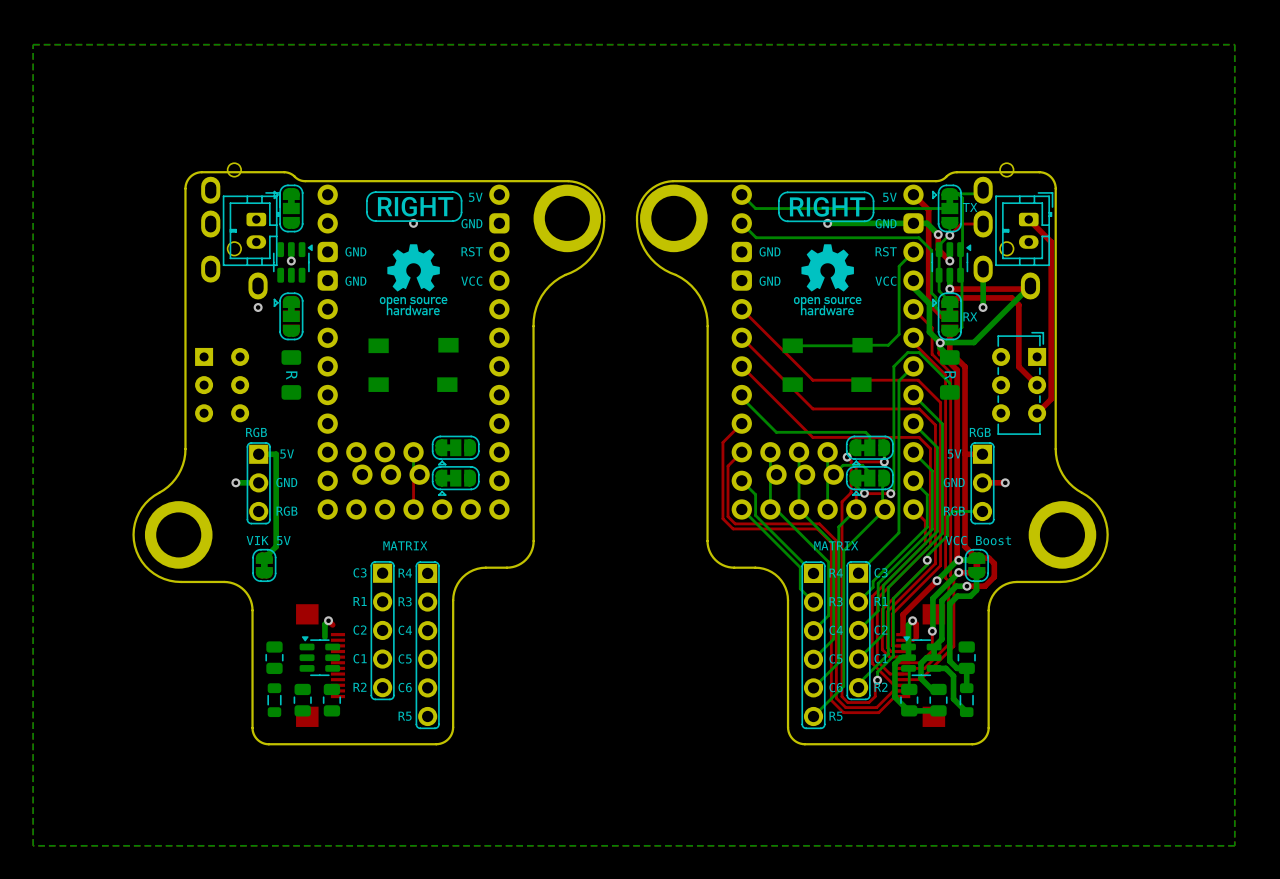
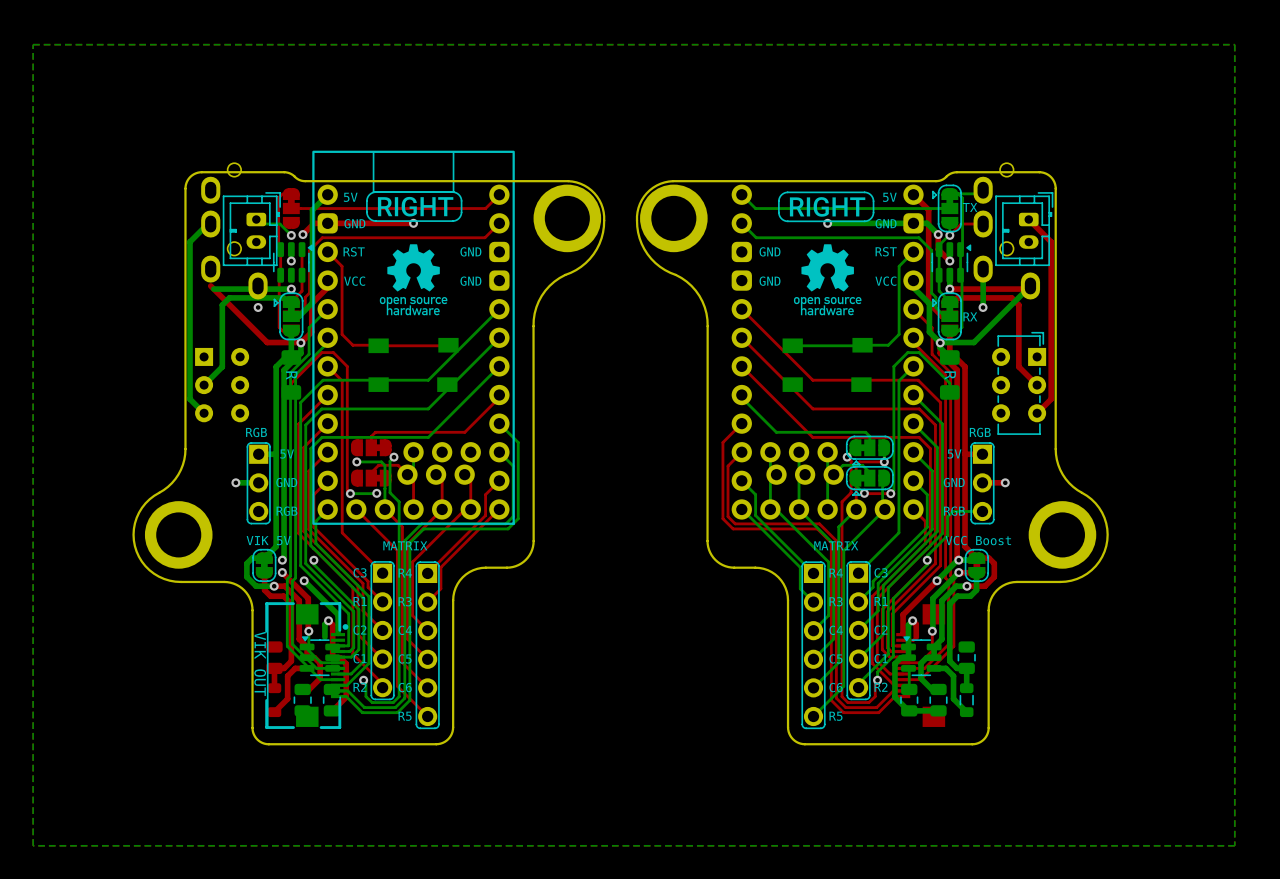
top track: none -> (282, 193) (278, 198) (280, 275)
bottom track: none -> (327, 194) (312, 209) (312, 302) (299, 316) (291, 316)
top track: none -> (499, 194) (485, 208) (300, 208)
part side: bottom (288, 208) -> top (291, 208)
bottom track: none -> (212, 219) (189, 241) (189, 399) (204, 413)
top track: none -> (413, 223) (314, 223) (302, 234)
top track: none -> (499, 223) (484, 237) (322, 237) (309, 250) (309, 293) (305, 297) (305, 307) (296, 316)
bottom track: none -> (258, 224) (279, 224) (291, 235)
via: none -> (302, 234)
via: none -> (291, 235)
top track: none -> (302, 249) (302, 291) (291, 301)
top track: none -> (327, 251) (342, 266) (342, 334) (352, 345) (378, 345)
top track: none -> (279, 276) (279, 327) (282, 331) (291, 331)
top track: none -> (210, 285) (267, 342) (300, 342) (311, 332) (311, 303) (327, 287)
bottom track: none -> (291, 289) (213, 289)
via: none -> (291, 289)
bottom track: none -> (287, 301) (283, 297) (229, 297) (222, 305) (222, 366) (204, 385)
bottom track: none -> (327, 309) (309, 327) (309, 354) (290, 372) (290, 575) (287, 579) (287, 598)
bottom track: none -> (499, 309) (428, 380) (323, 380) (300, 402) (300, 565) (348, 613) (348, 645) (337, 645)
bottom track: none -> (291, 330) (291, 351) (276, 366) (276, 454)
bottom track: none -> (499, 337) (428, 408) (321, 408) (305, 425) (305, 563) (353, 611) (353, 647) (349, 651) (337, 651)
bottom track: none -> (300, 342) (300, 353) (284, 370) (284, 558) (282, 560)
via: none -> (300, 342)
bottom track: none -> (327, 342) (295, 374) (295, 578) (292, 581) (292, 600)
top track: none -> (448, 345) (379, 345)
part side: top (413, 352) -> bottom (413, 337)
top track: none -> (327, 366) (342, 380) (342, 532) (382, 573)
bottom track: none -> (499, 366) (428, 437) (321, 437) (310, 448) (310, 545) (313, 548)
top track: none -> (291, 392) (291, 383) (321, 352) (333, 352) (347, 366) (347, 490) (350, 493)
top track: none -> (327, 395) (298, 424) (298, 533) (352, 587) (352, 654) (382, 683) (382, 687)
top track: none -> (499, 397) (464, 432) (375, 432) (371, 436) (371, 447)
top track: none -> (327, 423) (303, 447) (303, 531) (357, 585) (357, 634) (382, 659)
bottom track: none -> (499, 423) (518, 442) (518, 518) (508, 528) (423, 528) (409, 542) (409, 700) (397, 712) (362, 712) (346, 696) (337, 696)
part side: bottom (455, 450) -> top (371, 447)
top track: none -> (327, 452) (308, 471) (308, 529) (363, 583) (363, 610) (382, 630)
bottom track: none -> (499, 452) (513, 466) (513, 516) (505, 523) (421, 523) (404, 540) (404, 698) (395, 707) (364, 707) (347, 690) (337, 690)
bottom track: none -> (393, 457) (390, 461) (390, 492) (399, 501) (399, 696) (393, 702) (372, 702) (365, 696)
via: none -> (393, 457)
bottom track: none -> (356, 461) (381, 461) (384, 465) (384, 488)
via: none -> (356, 461)
top track: none -> (371, 472) (378, 465) (398, 465) (407, 474)
top track: none -> (327, 480) (313, 494) (313, 527) (368, 581) (368, 587) (382, 601)
top track: none -> (442, 480) (442, 509) (407, 544) (407, 639) (427, 659)
part side: bottom (455, 480) -> top (371, 478)
top track: none -> (470, 480) (470, 509)
top track: none -> (499, 480) (485, 494) (485, 515) (427, 573)
bottom track: none -> (384, 488) (384, 509)
via: none -> (350, 493)
bottom track: none -> (376, 493) (350, 493)
via: none -> (376, 493)
bottom track: none -> (327, 509) (315, 521) (315, 543)
top track: none -> (356, 509) (397, 550) (397, 686) (427, 716)
top track: none -> (384, 509) (402, 526) (402, 662) (427, 687)
top track: none -> (465, 509) (412, 562) (412, 615) (427, 630)
top track: none -> (498, 509) (440, 567) (440, 588) (427, 602)
bottom track: none -> (316, 543) (368, 596) (368, 663) (347, 685) (337, 685)
bottom track: none -> (313, 548) (363, 598) (363, 661) (351, 674) (337, 674)
bottom track: none -> (264, 558) (252, 558) (246, 563) (246, 576) (256, 586) (274, 586)
via: none -> (282, 560)
bottom track: none -> (313, 560) (313, 564) (358, 609) (358, 649) (351, 657) (337, 657)
via: none -> (313, 560)
top track: none -> (264, 572) (264, 590) (270, 596) (283, 596) (291, 603) (291, 661) (284, 668) (275, 668)
top track: none -> (282, 572) (308, 598) (308, 631)
via: none -> (282, 572)
bottom track: none -> (304, 580) (338, 614) (338, 633)
via: none -> (304, 580)
top track: none -> (274, 586) (284, 586) (299, 600) (299, 639) (307, 646) (307, 657) (314, 657) (320, 663) (320, 678) (309, 689) (302, 689)
via: none -> (274, 586)
bottom track: none -> (287, 598) (287, 646) (320, 679) (337, 679)
bottom track: none -> (292, 600) (292, 644) (316, 668) (337, 668)
top track: none -> (332, 624) (332, 657) (340, 657) (346, 663) (346, 697) (332, 710)
bottom track: none -> (308, 631) (308, 650) (320, 662) (337, 662)
via: none -> (308, 631)
part side: bottom (274, 657) -> top (274, 657)
part side: top (320, 665) -> bottom (306, 665)
top track: none -> (274, 668) (274, 688)
top track: none -> (307, 668) (295, 668) (287, 676) (287, 698) (274, 712)
bottom track: none -> (363, 680) (365, 682) (365, 696)
via: none -> (363, 680)
part side: bottom (274, 700) -> top (274, 700)

